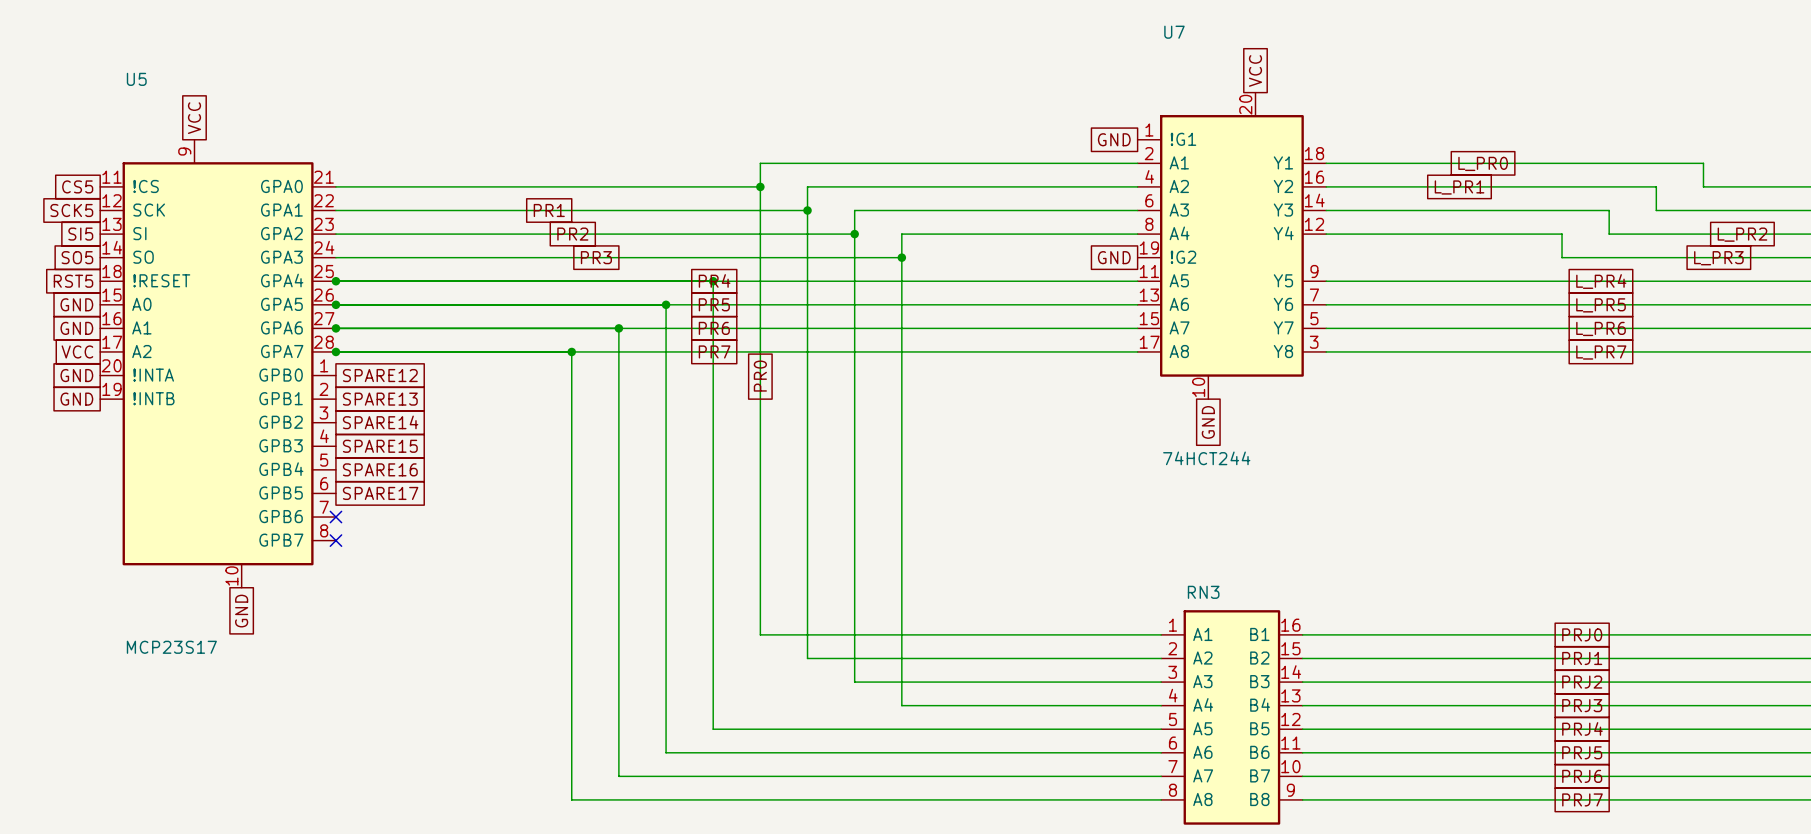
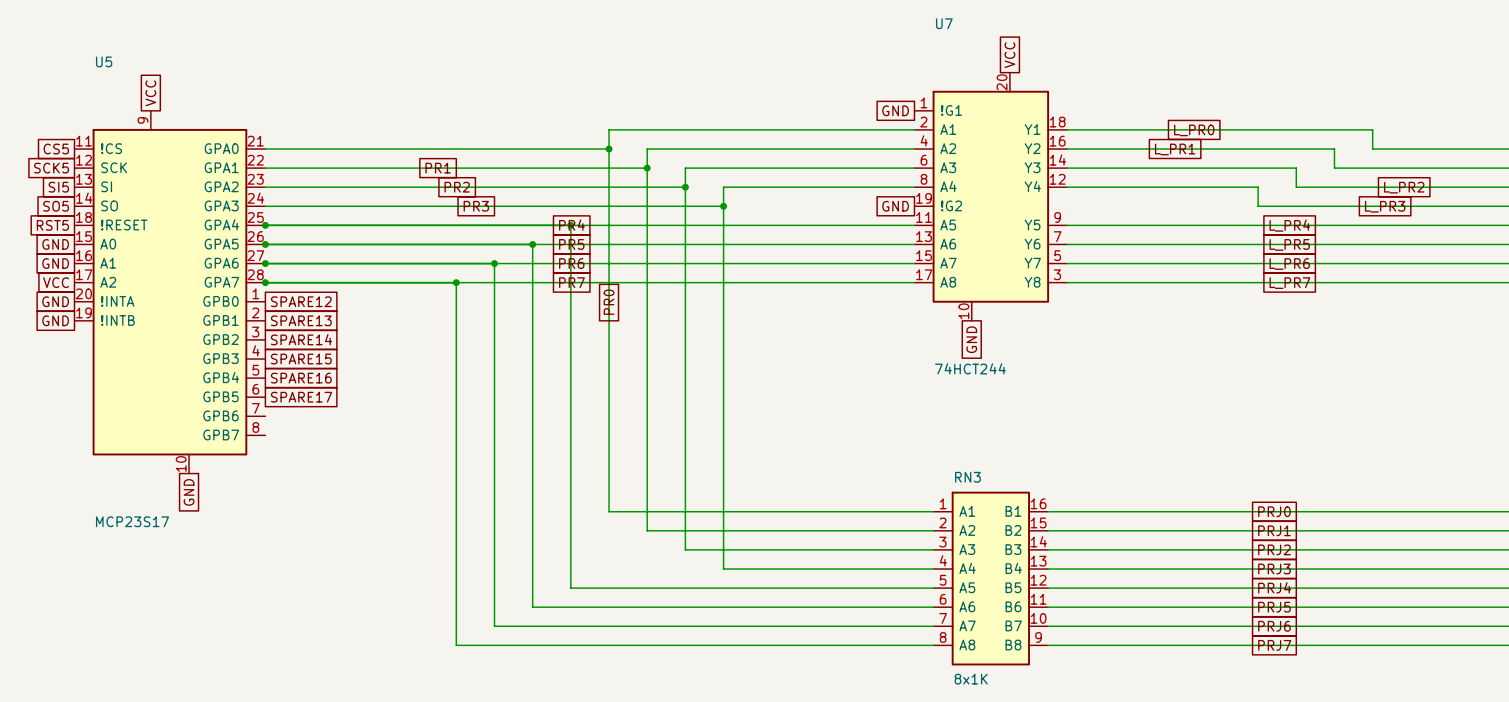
no-connect mark: (335, 517) -> none
no-connect mark: (335, 540) -> none

